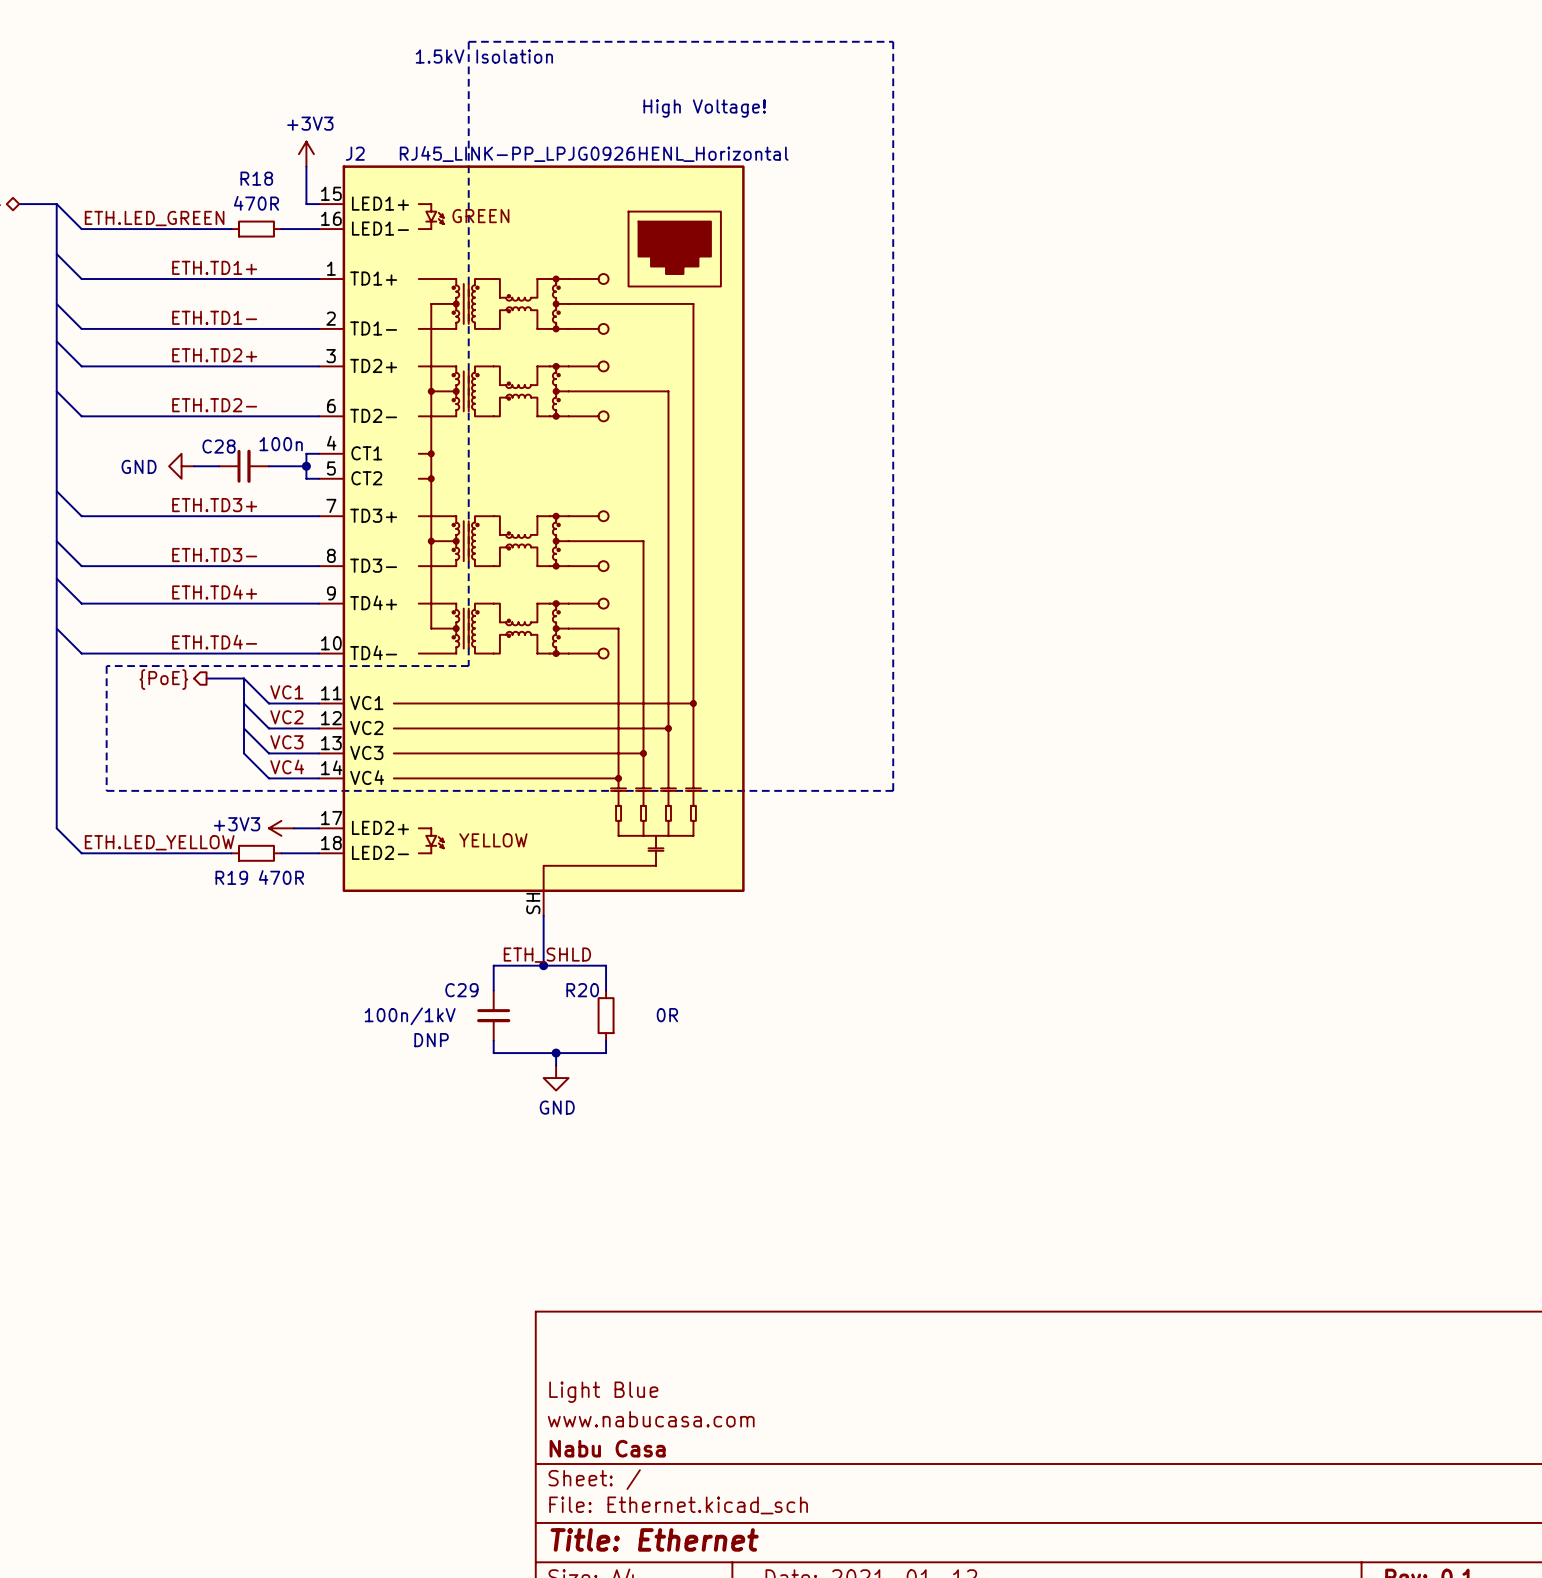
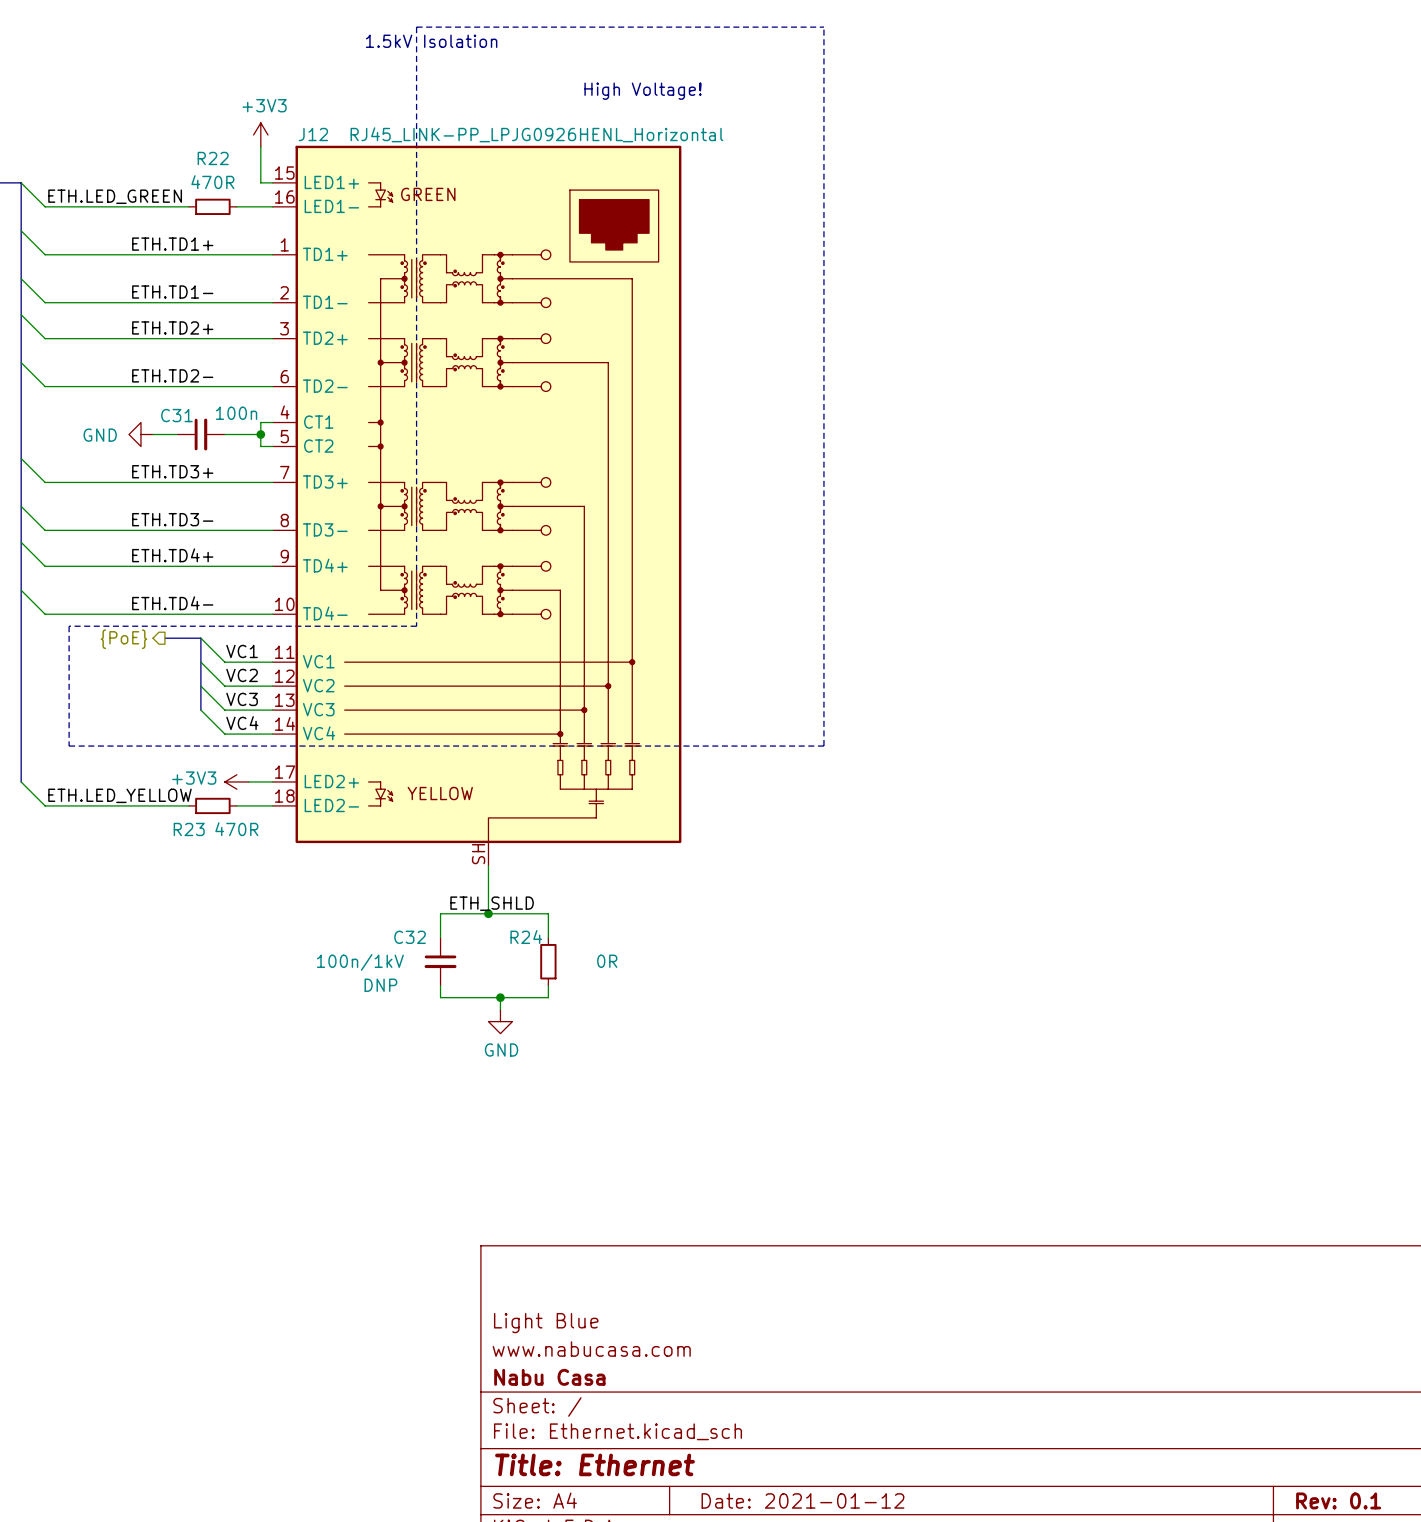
J2 name: J2 (355, 153) -> J12 (313, 134)
R18 name: R18 (256, 178) -> R22 (213, 158)
C28 name: C28 (219, 446) -> C31 (176, 415)
R19 name: R19 (231, 877) -> R23 (189, 829)
C29 name: C29 (461, 990) -> C32 (410, 937)
R20 name: R20 (582, 990) -> R24 (526, 937)

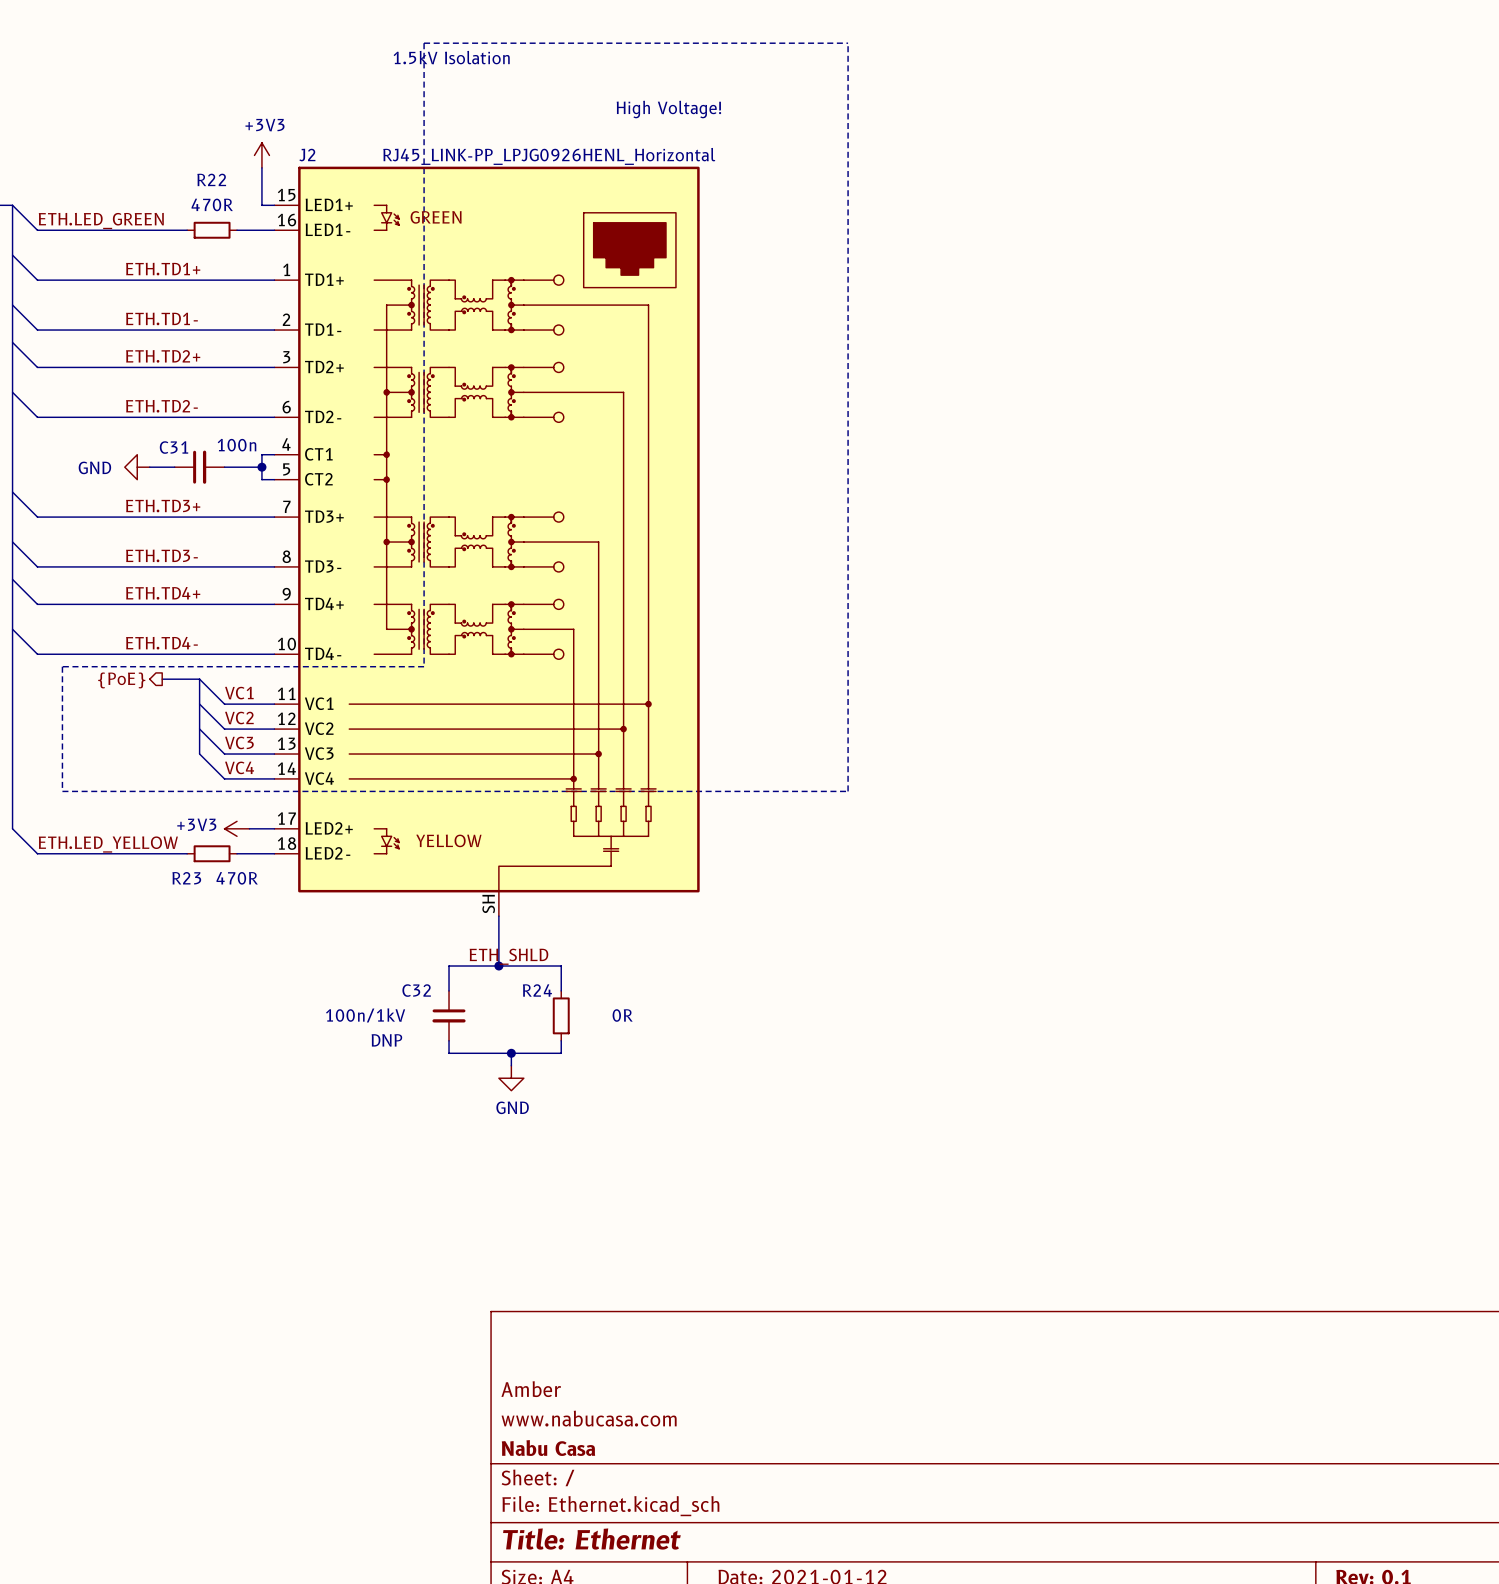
J12 name: J12 (313, 134) -> J2 (307, 155)
title block: Light Blue (546, 1323) -> Amber (531, 1389)

